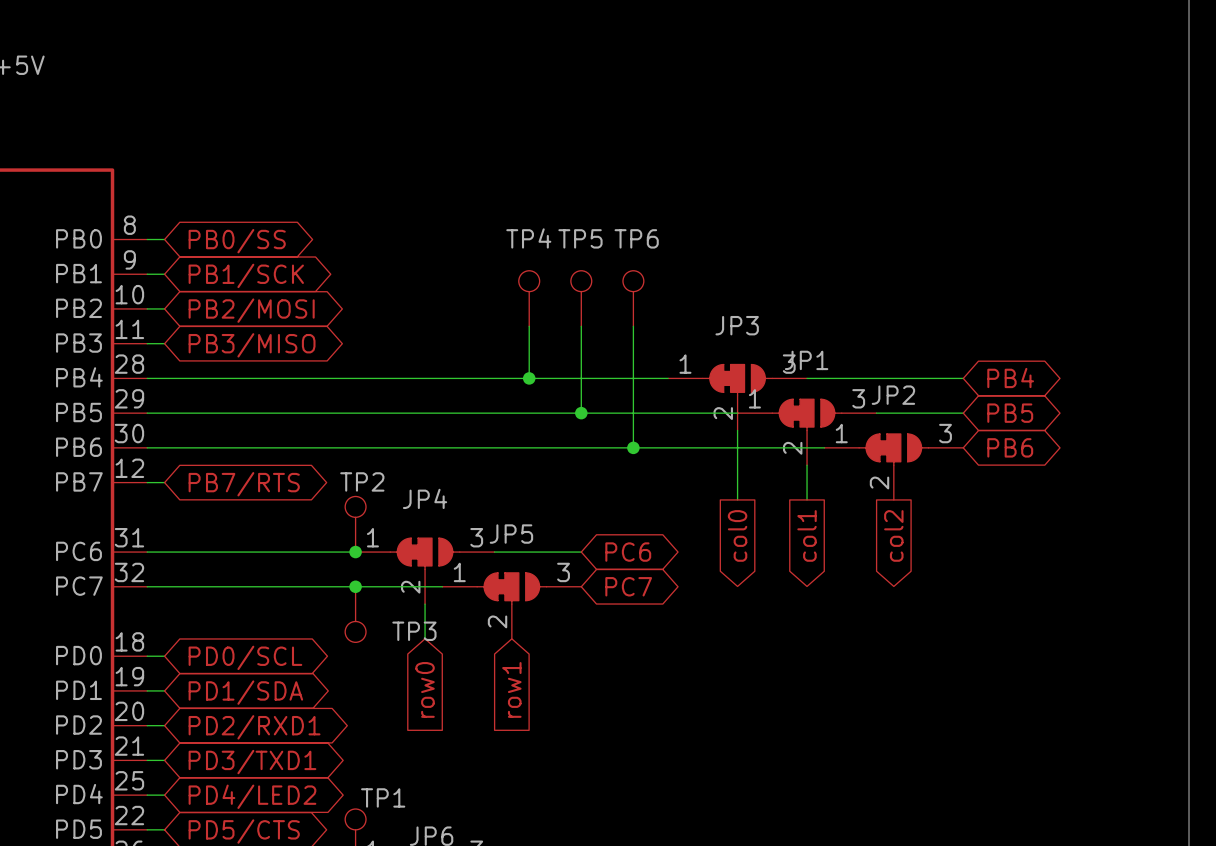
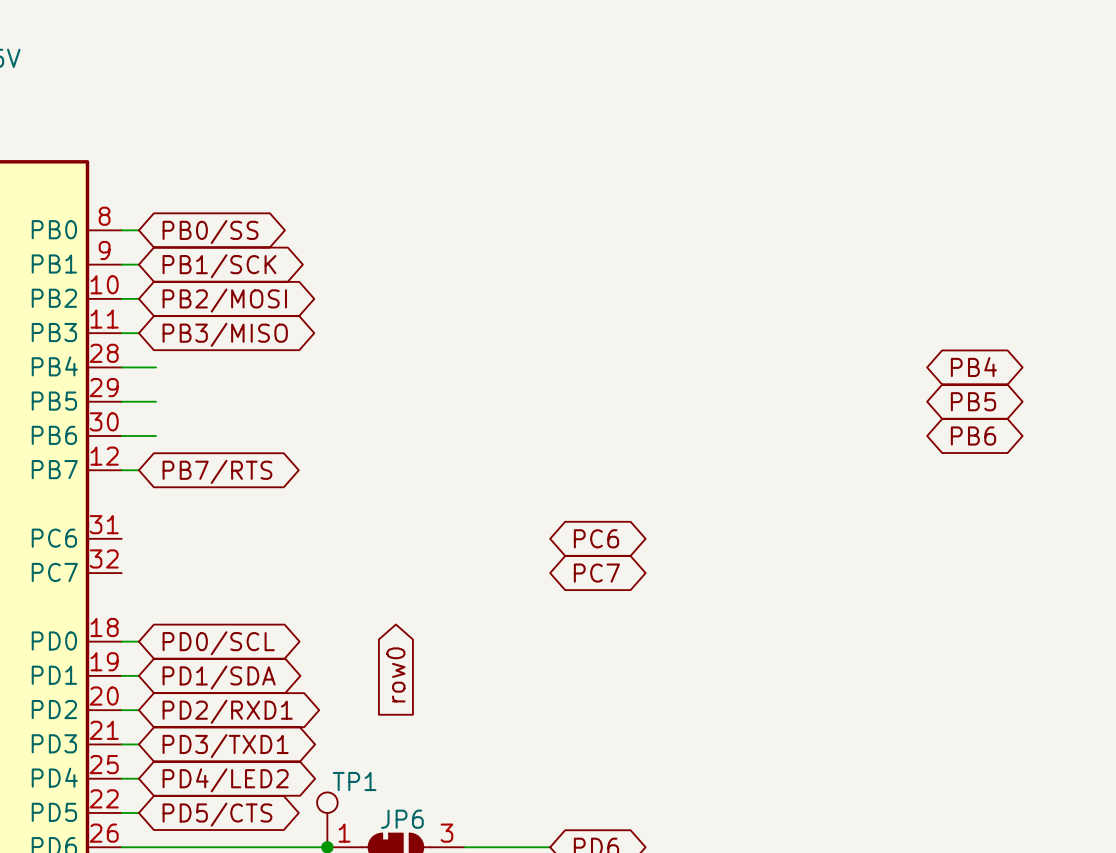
TP4: (529, 298) -> none
TP5: (581, 298) -> none
TP6: (633, 298) -> none
wire: (529, 326) (529, 378) -> none
wire: (581, 326) (581, 413) -> none
wire: (633, 326) (633, 447) -> none
wire: (181, 378) (668, 378) -> none
junction: (529, 378) -> none
wire: (807, 378) (963, 378) -> none
JP3: (737, 397) -> none
wire: (181, 413) (737, 413) -> none
junction: (581, 413) -> none
wire: (876, 413) (963, 413) -> none
wire: (737, 430) (737, 499) -> none
JP1: (807, 432) -> none
wire: (181, 447) (824, 447) -> none
junction: (633, 447) -> none
wire: (807, 465) (807, 499) -> none
JP2: (893, 466) -> none
TP2: (355, 524) -> none
global label: col0 (737, 535) -> none
global label: col1 (807, 535) -> none
global label: col2 (893, 535) -> none
wire: (147, 552) (355, 552) -> none
junction: (355, 552) -> none
wire: (494, 552) (581, 552) -> none
JP4: (425, 571) -> none
wire: (147, 586) (442, 586) -> none
junction: (355, 586) -> none
wire: (425, 604) (425, 638) -> none
JP5: (511, 605) -> none
TP3: (355, 614) -> none
global label: row1 (511, 689) -> none

